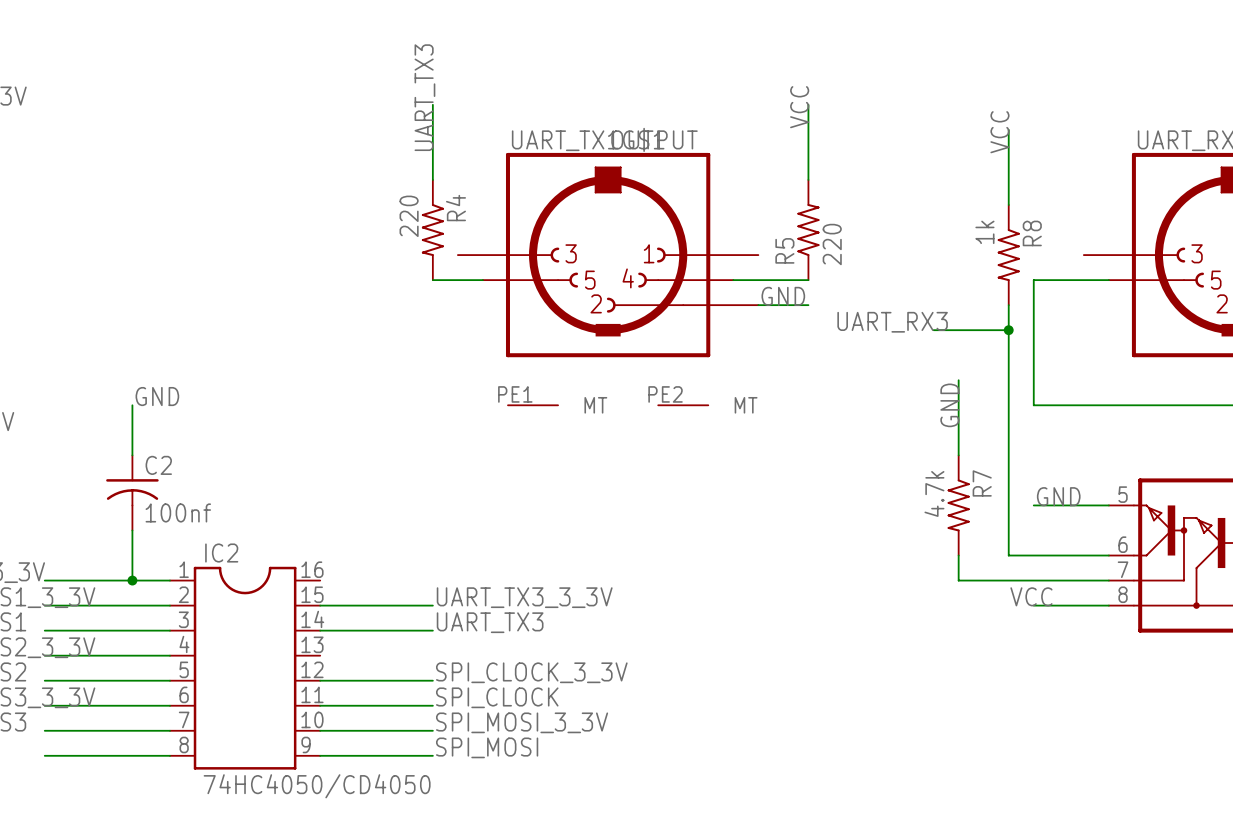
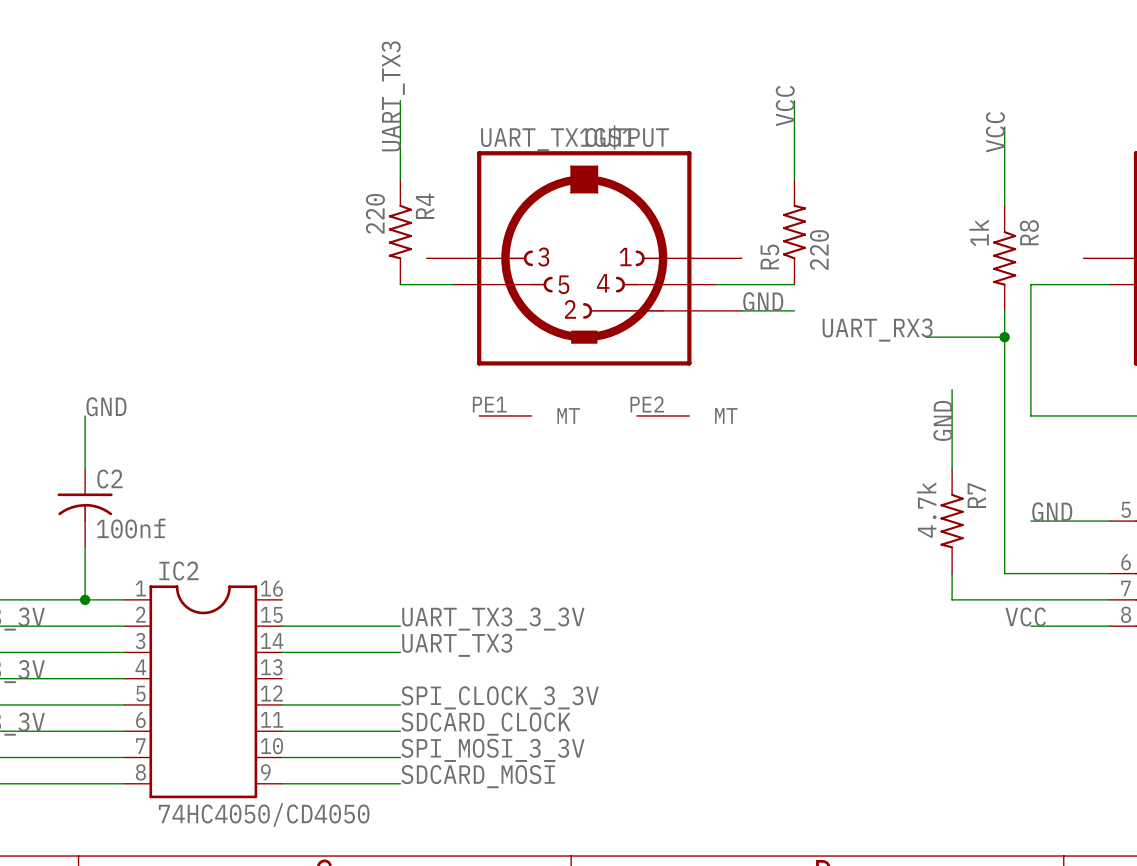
label: SPI_CLOCK (497, 697) -> SDCARD_CLOCK (486, 724)
label: SPI_MOSI (487, 747) -> SDCARD_MOSI (478, 776)

